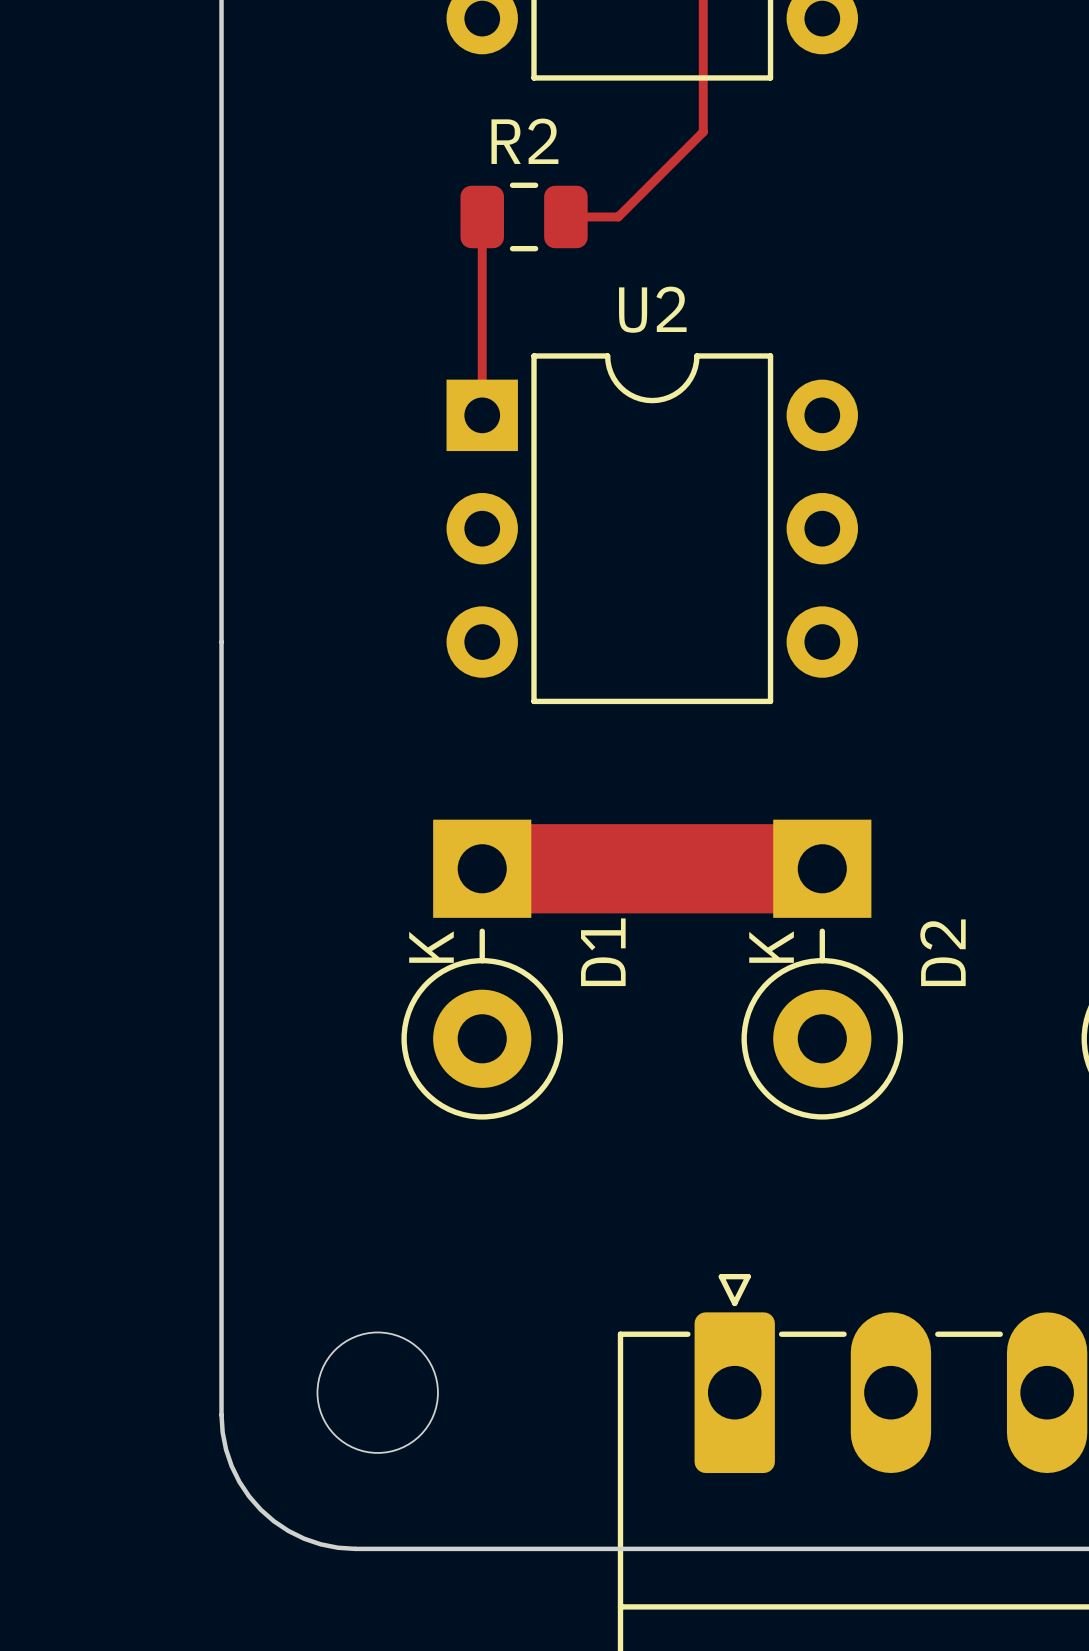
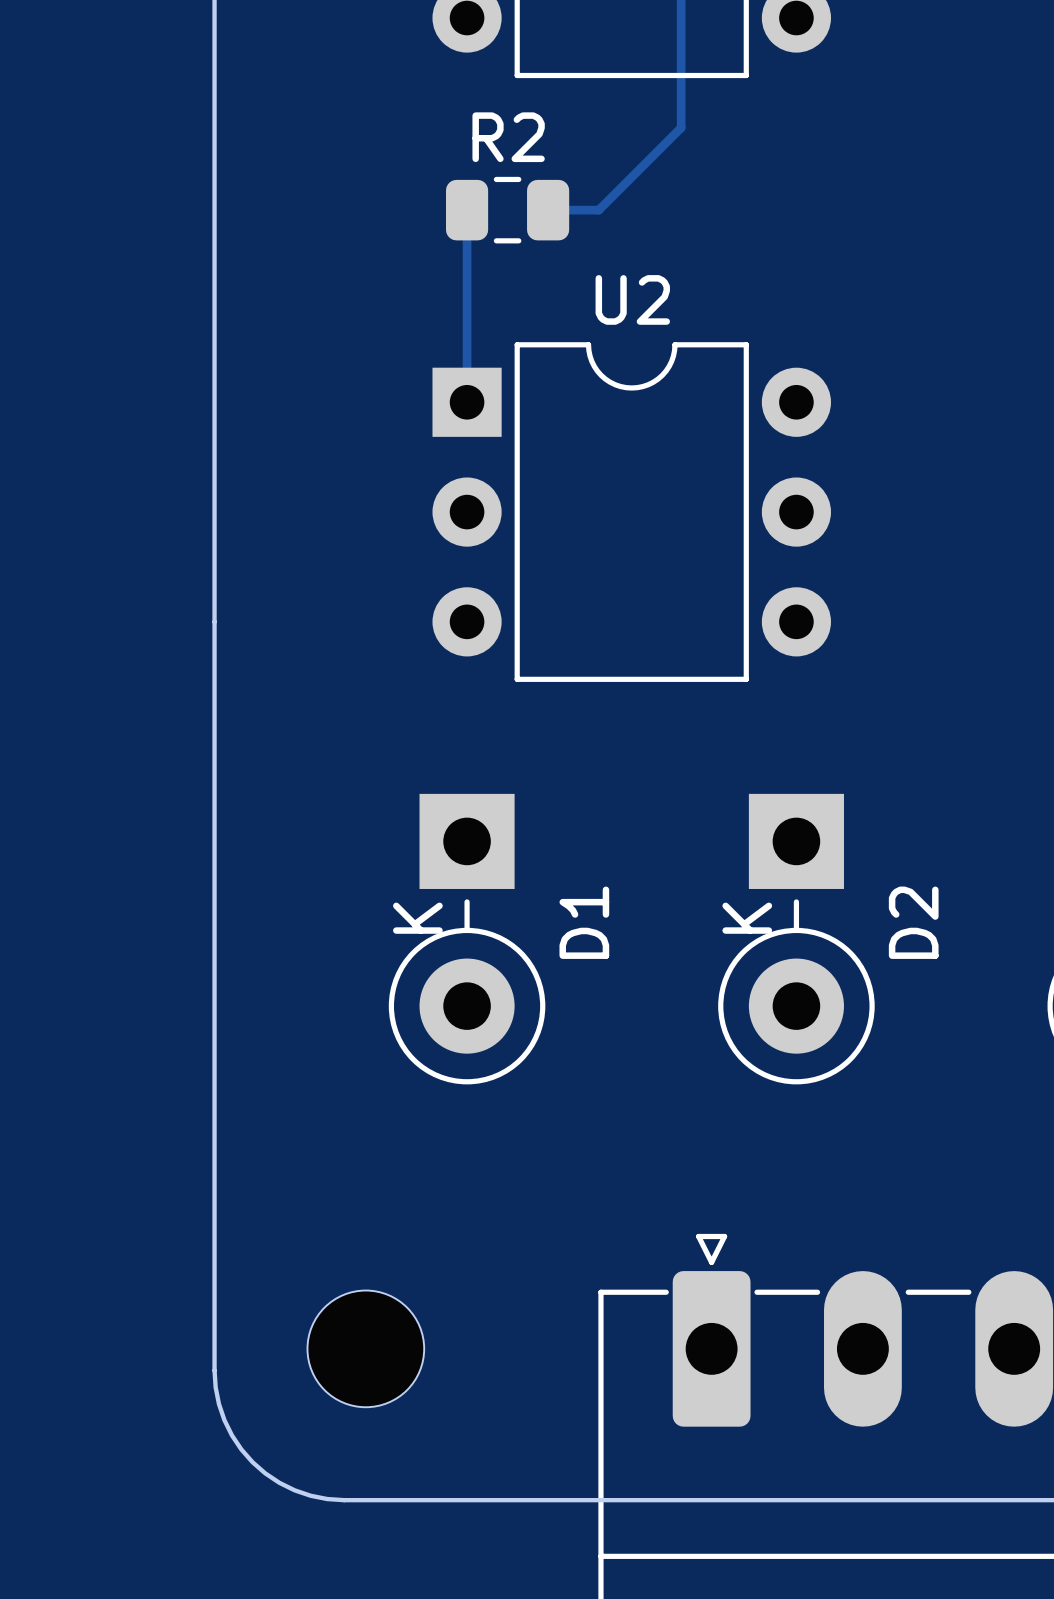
track: (482, 868) (822, 868) -> none

